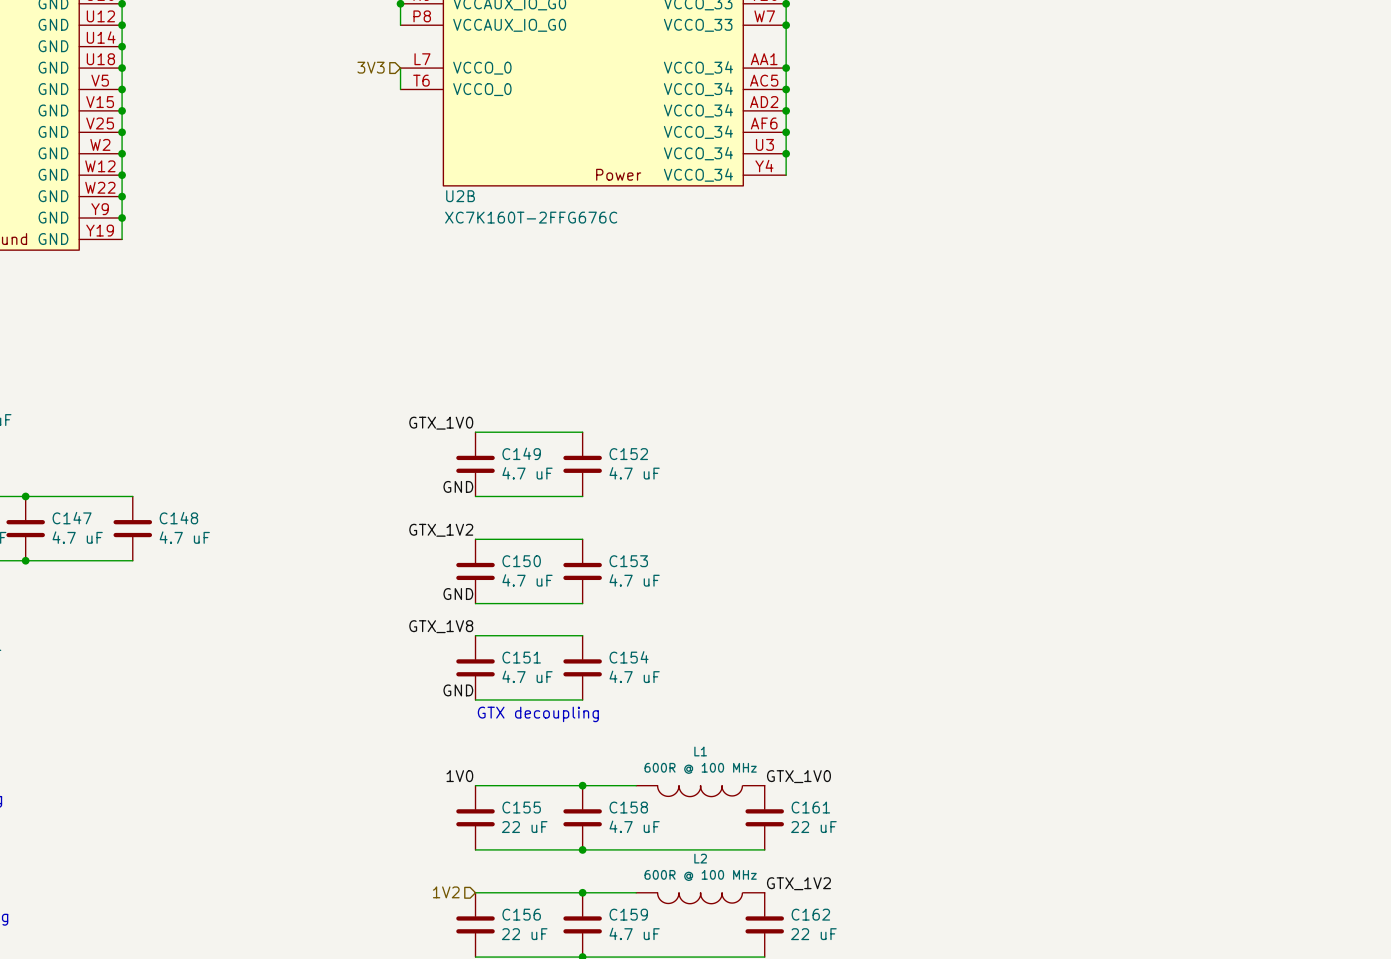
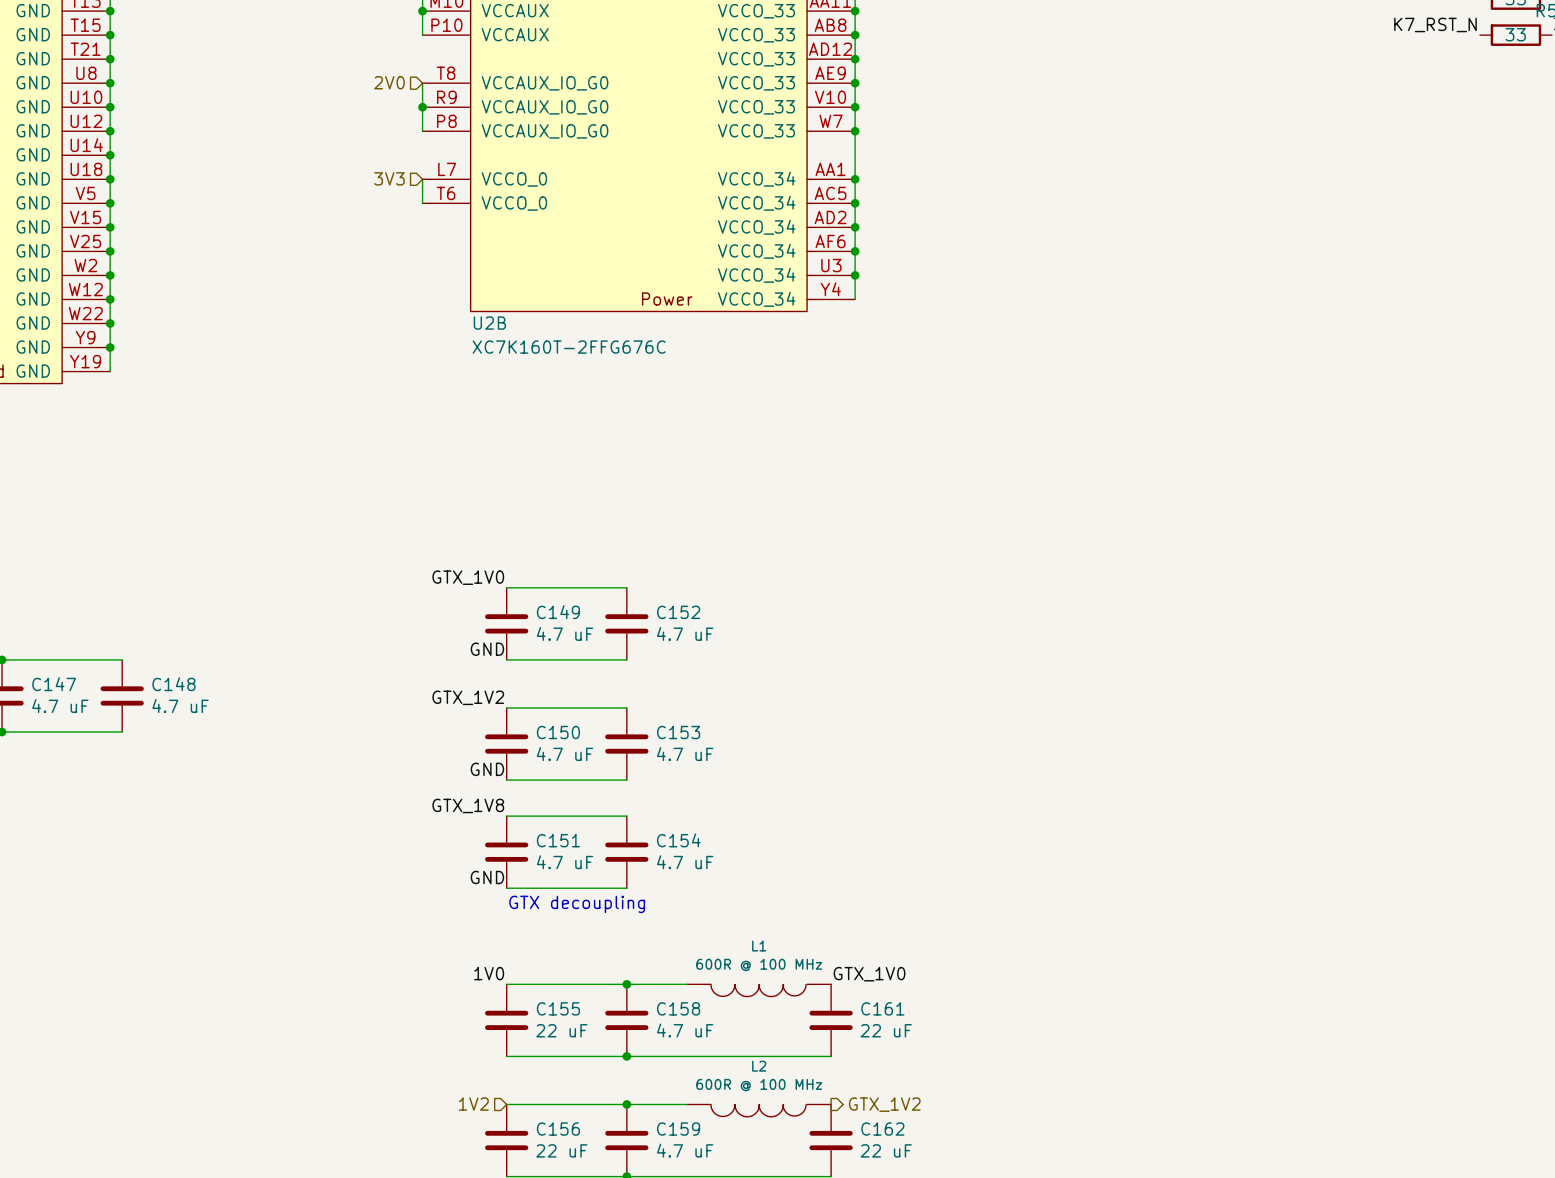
label: GTX_1V2 (798, 883) -> none
hierarchical label: none -> GTX_1V2 (884, 1104)

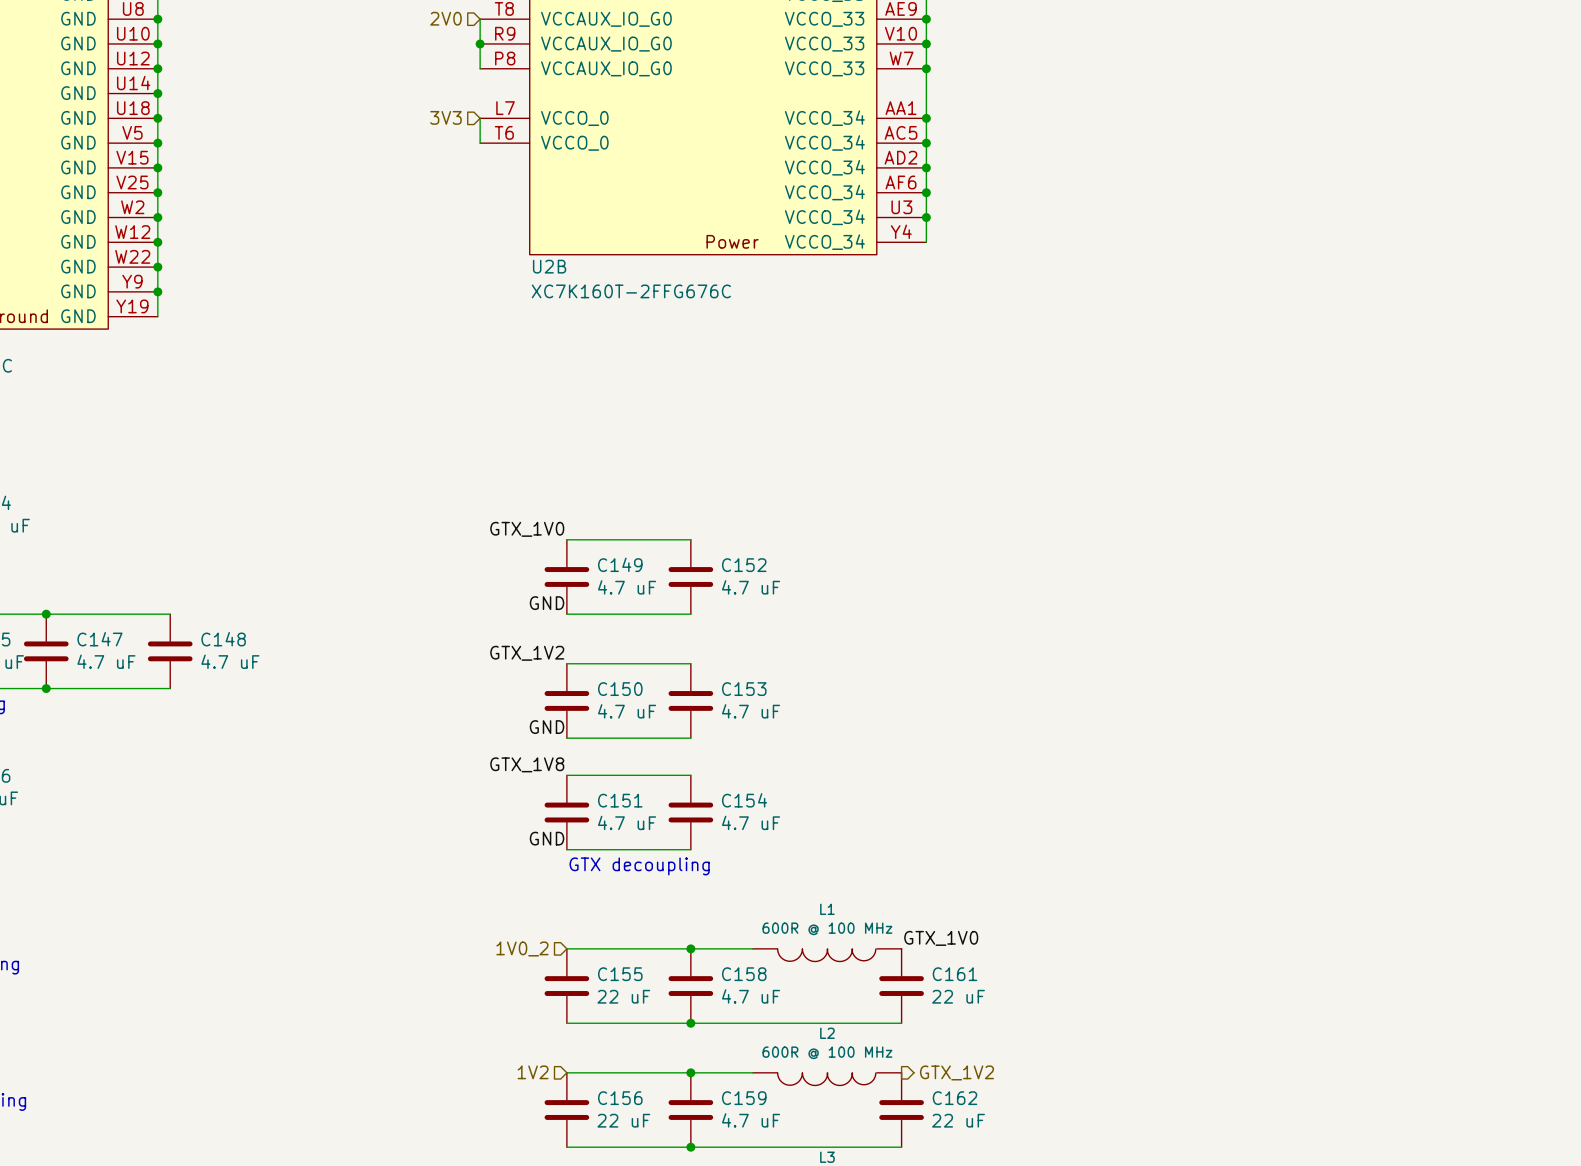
label: 1V0 (489, 973) -> none
hierarchical label: none -> 1V0_2 (522, 948)

